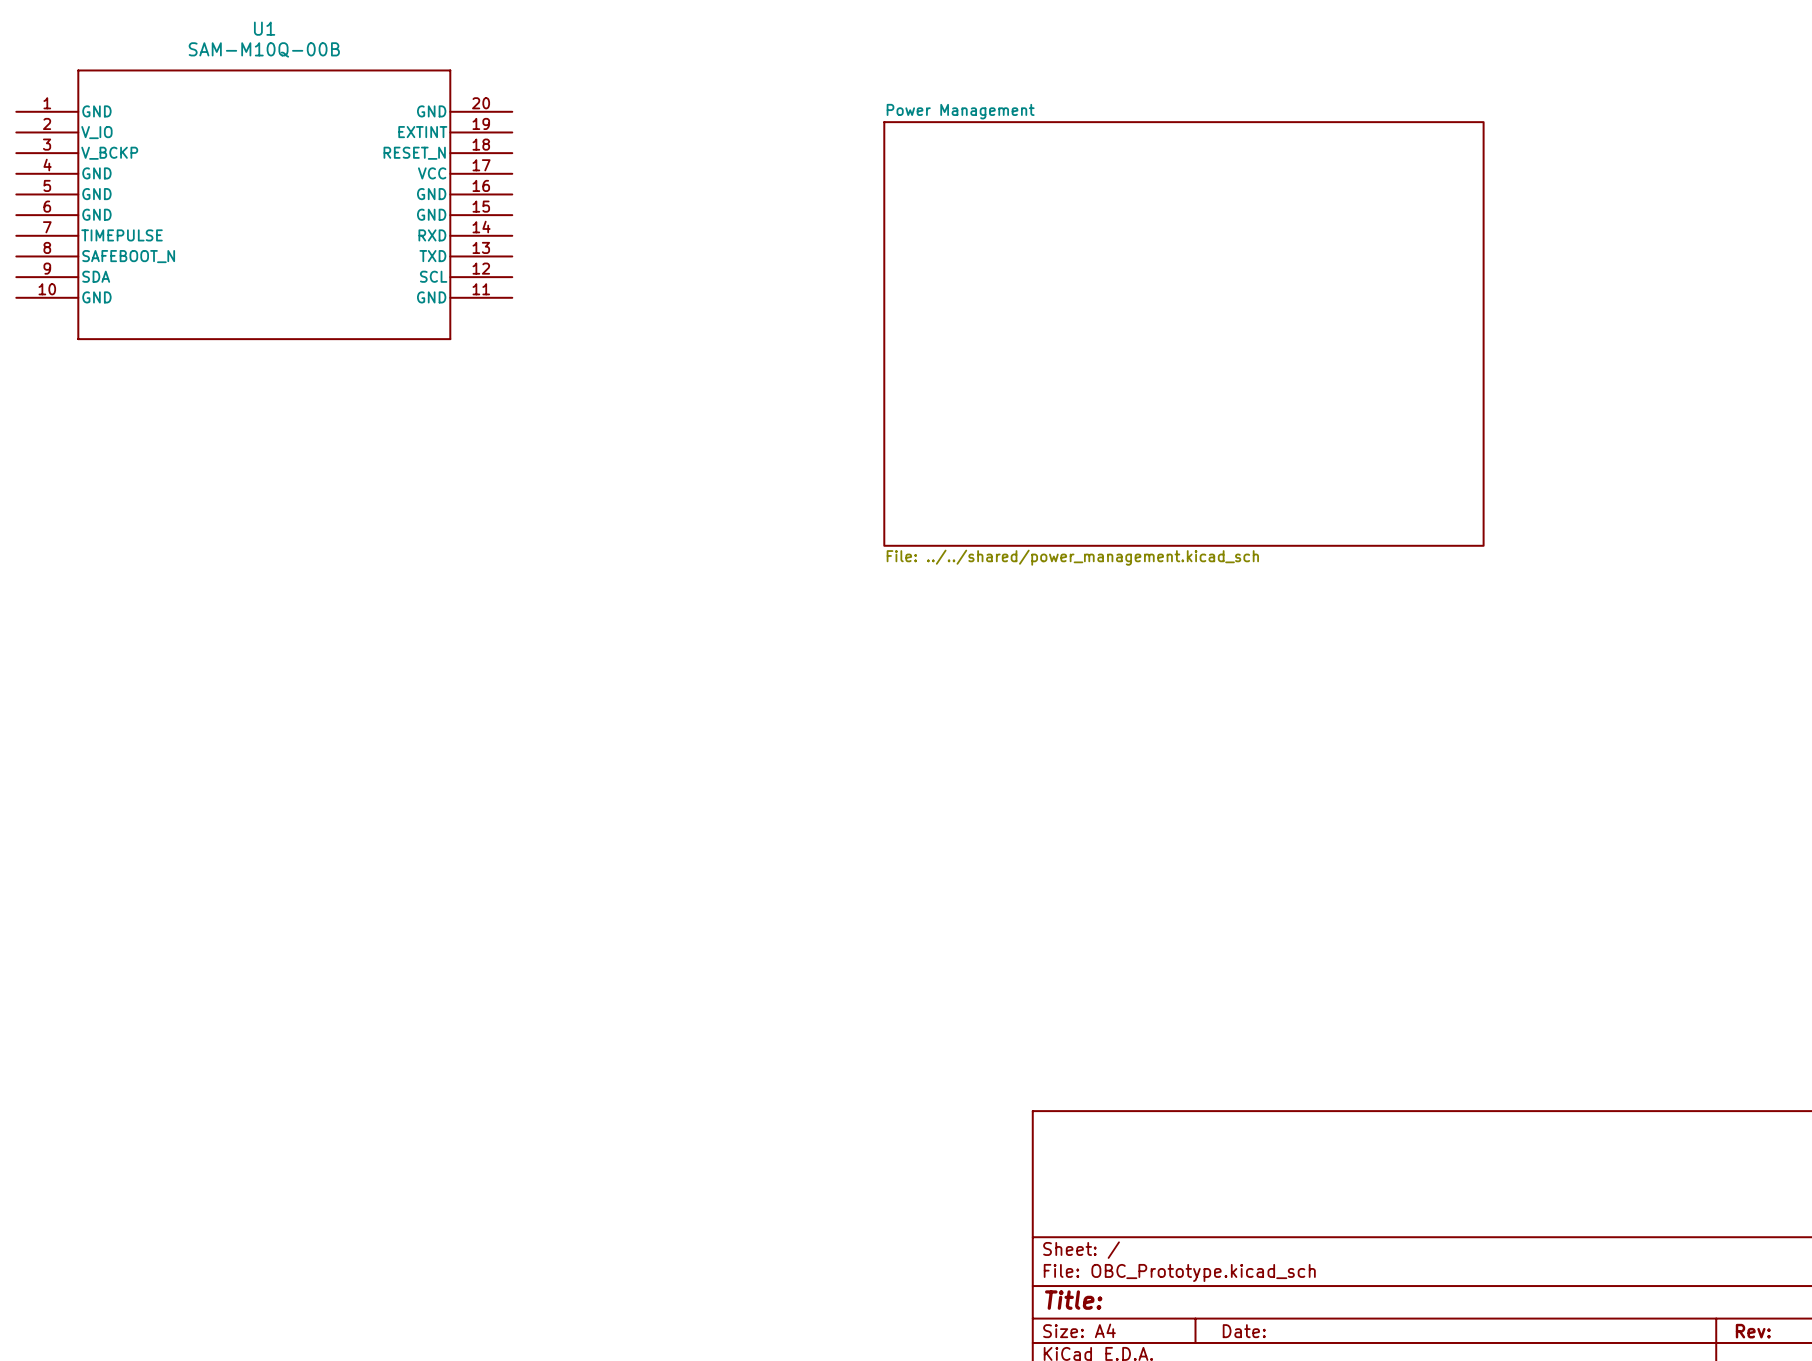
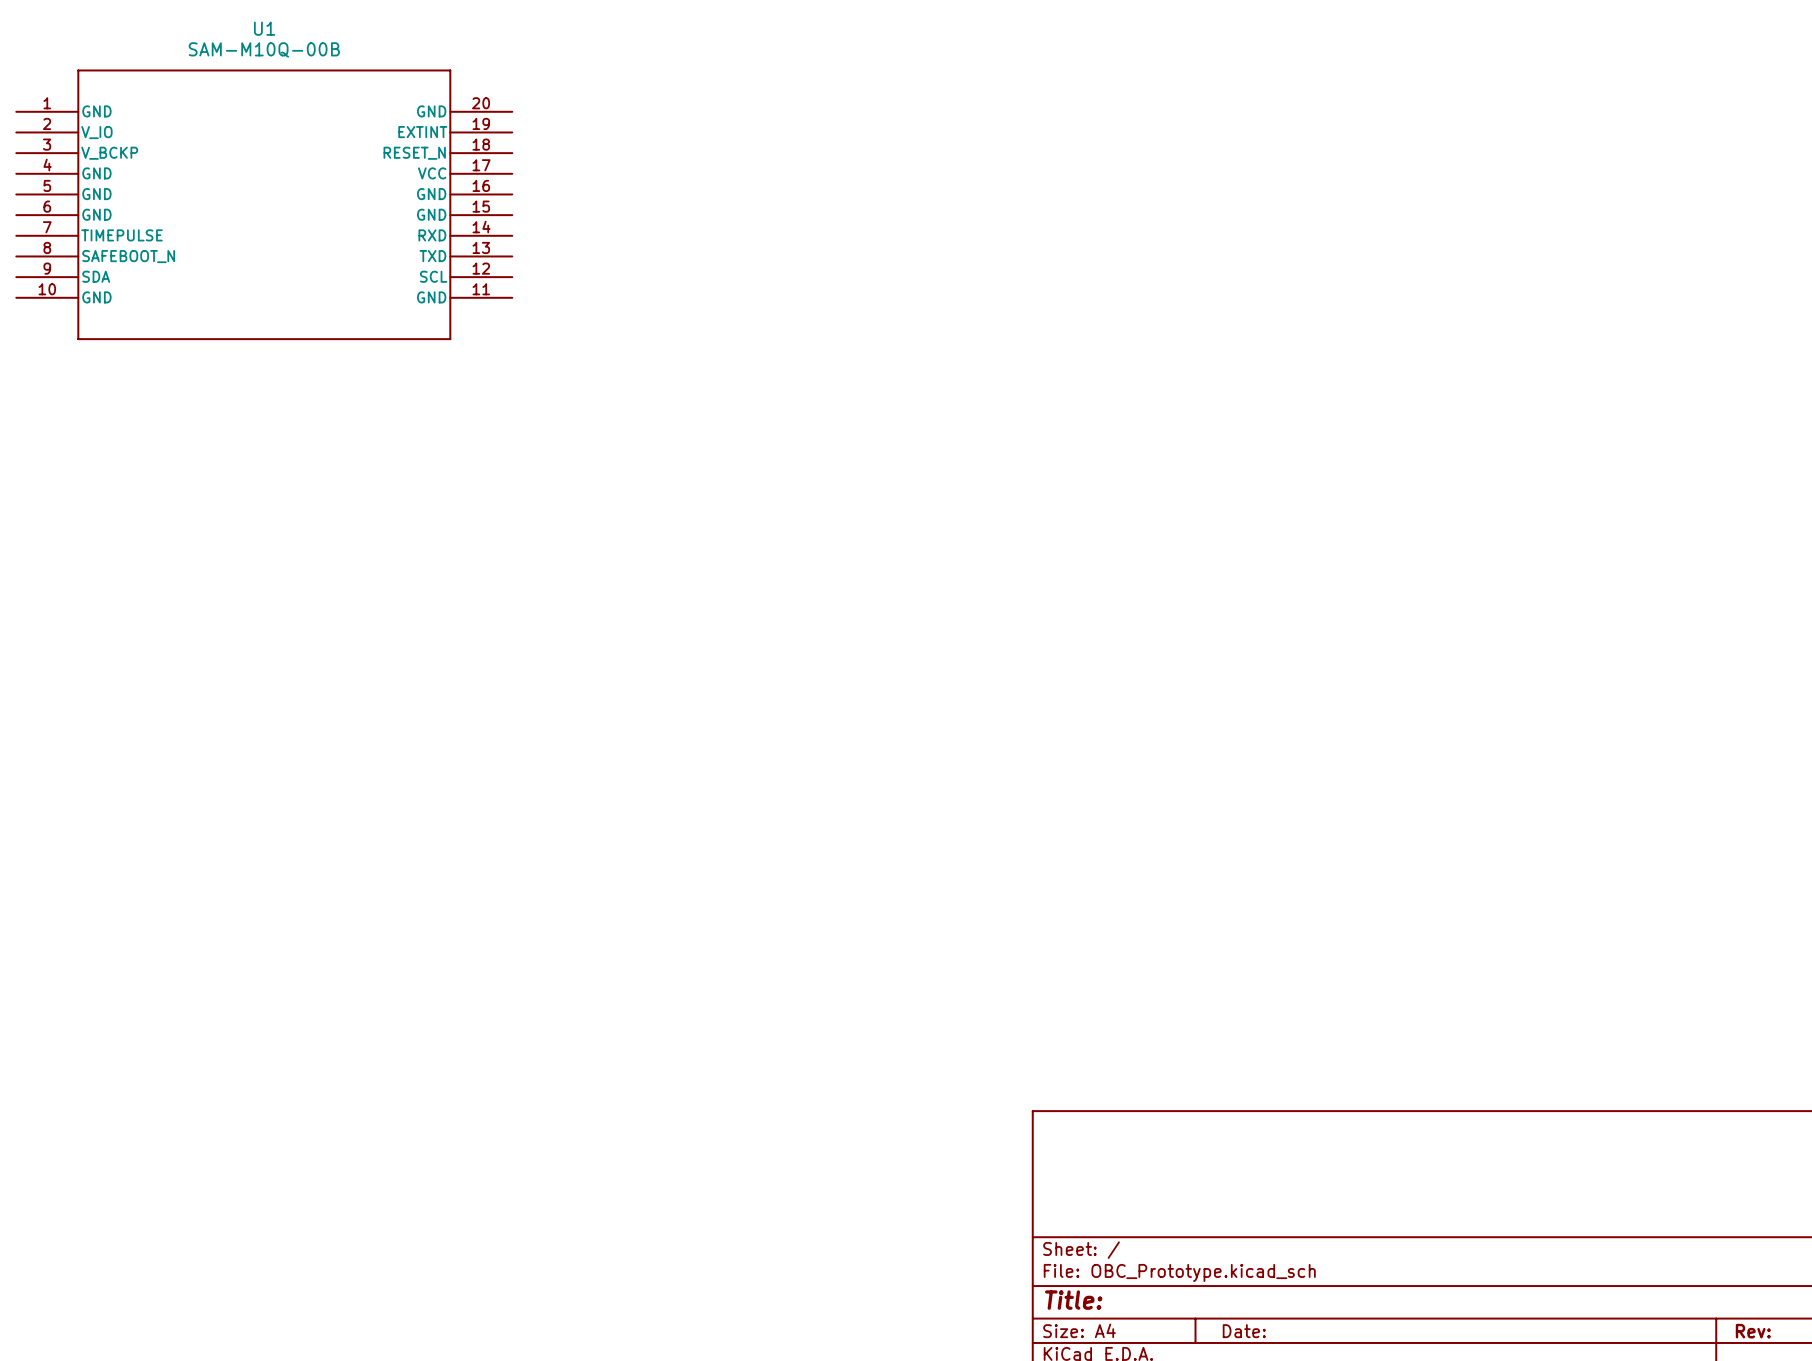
sheet Power Management: File: ../../shared/power_management.kicad_sch (1183, 333) -> none

